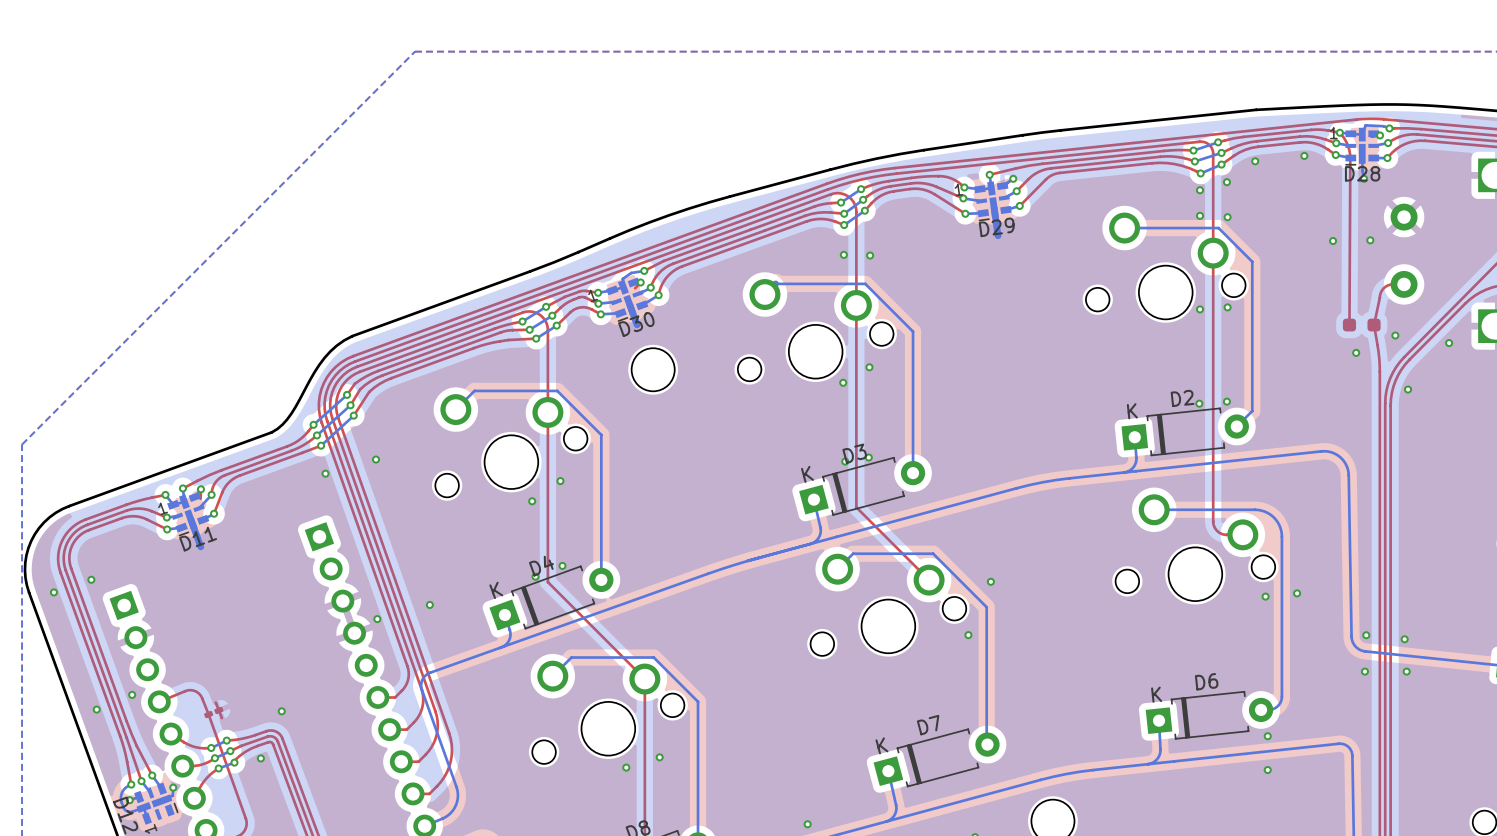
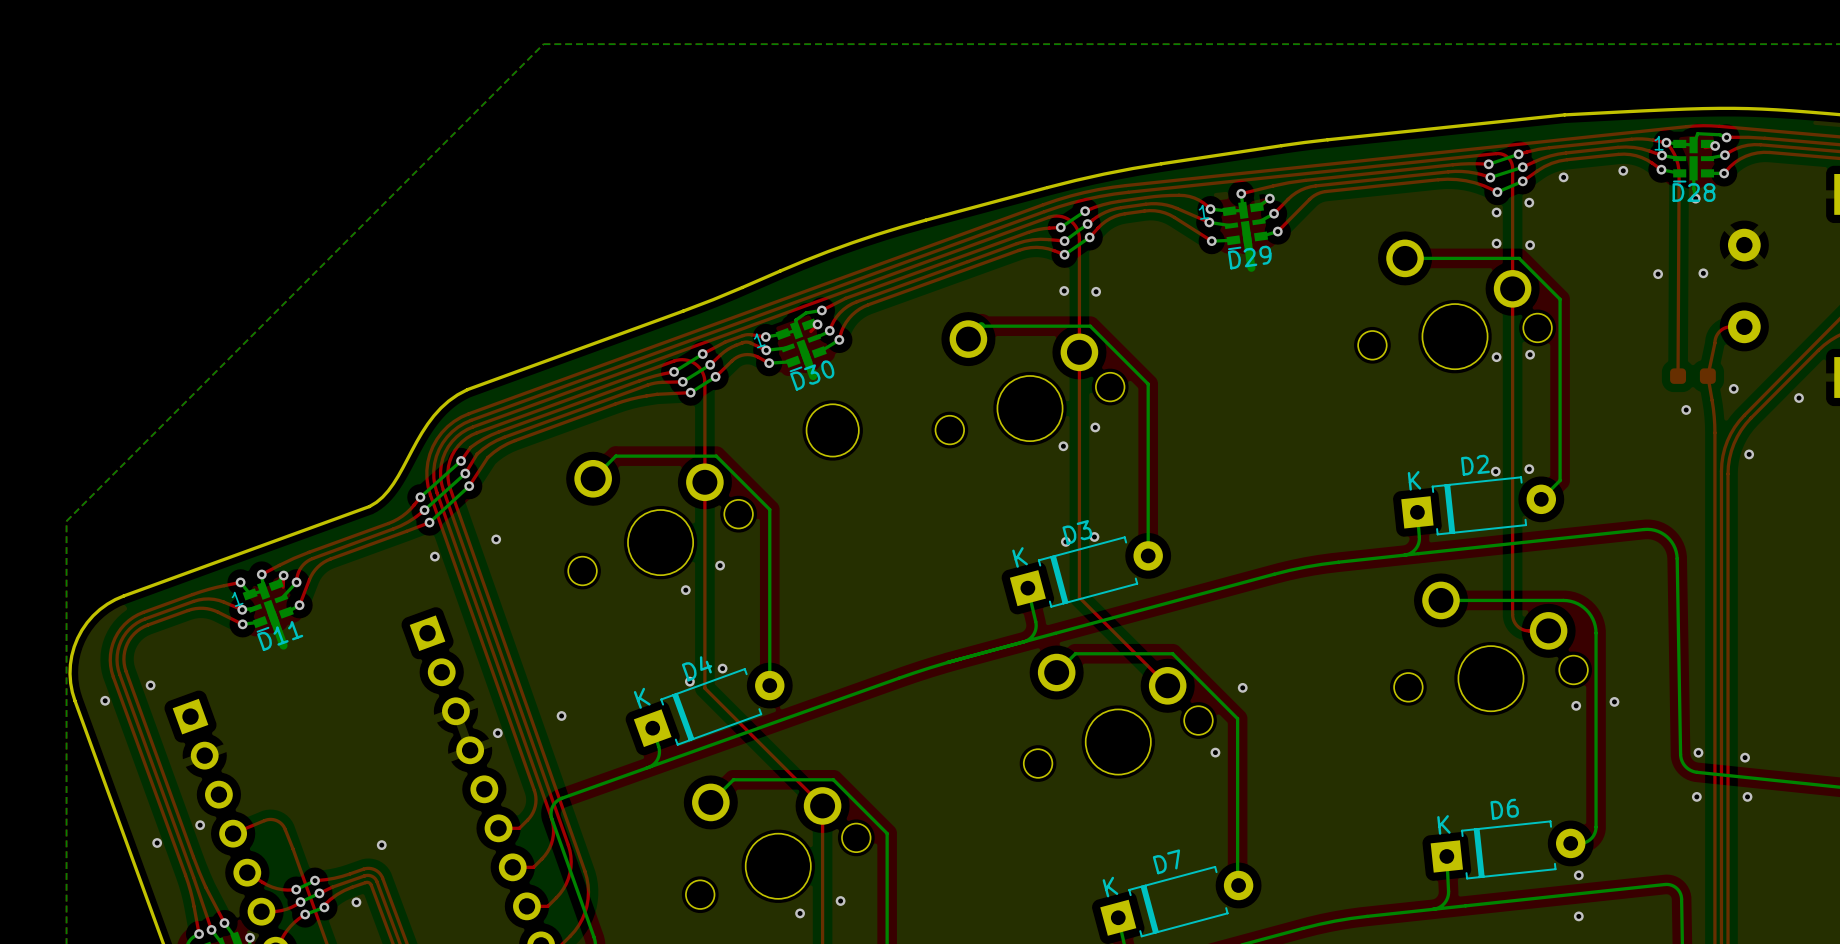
top track: (215, 702) (221, 718) -> none
part: (213, 712) -> none

